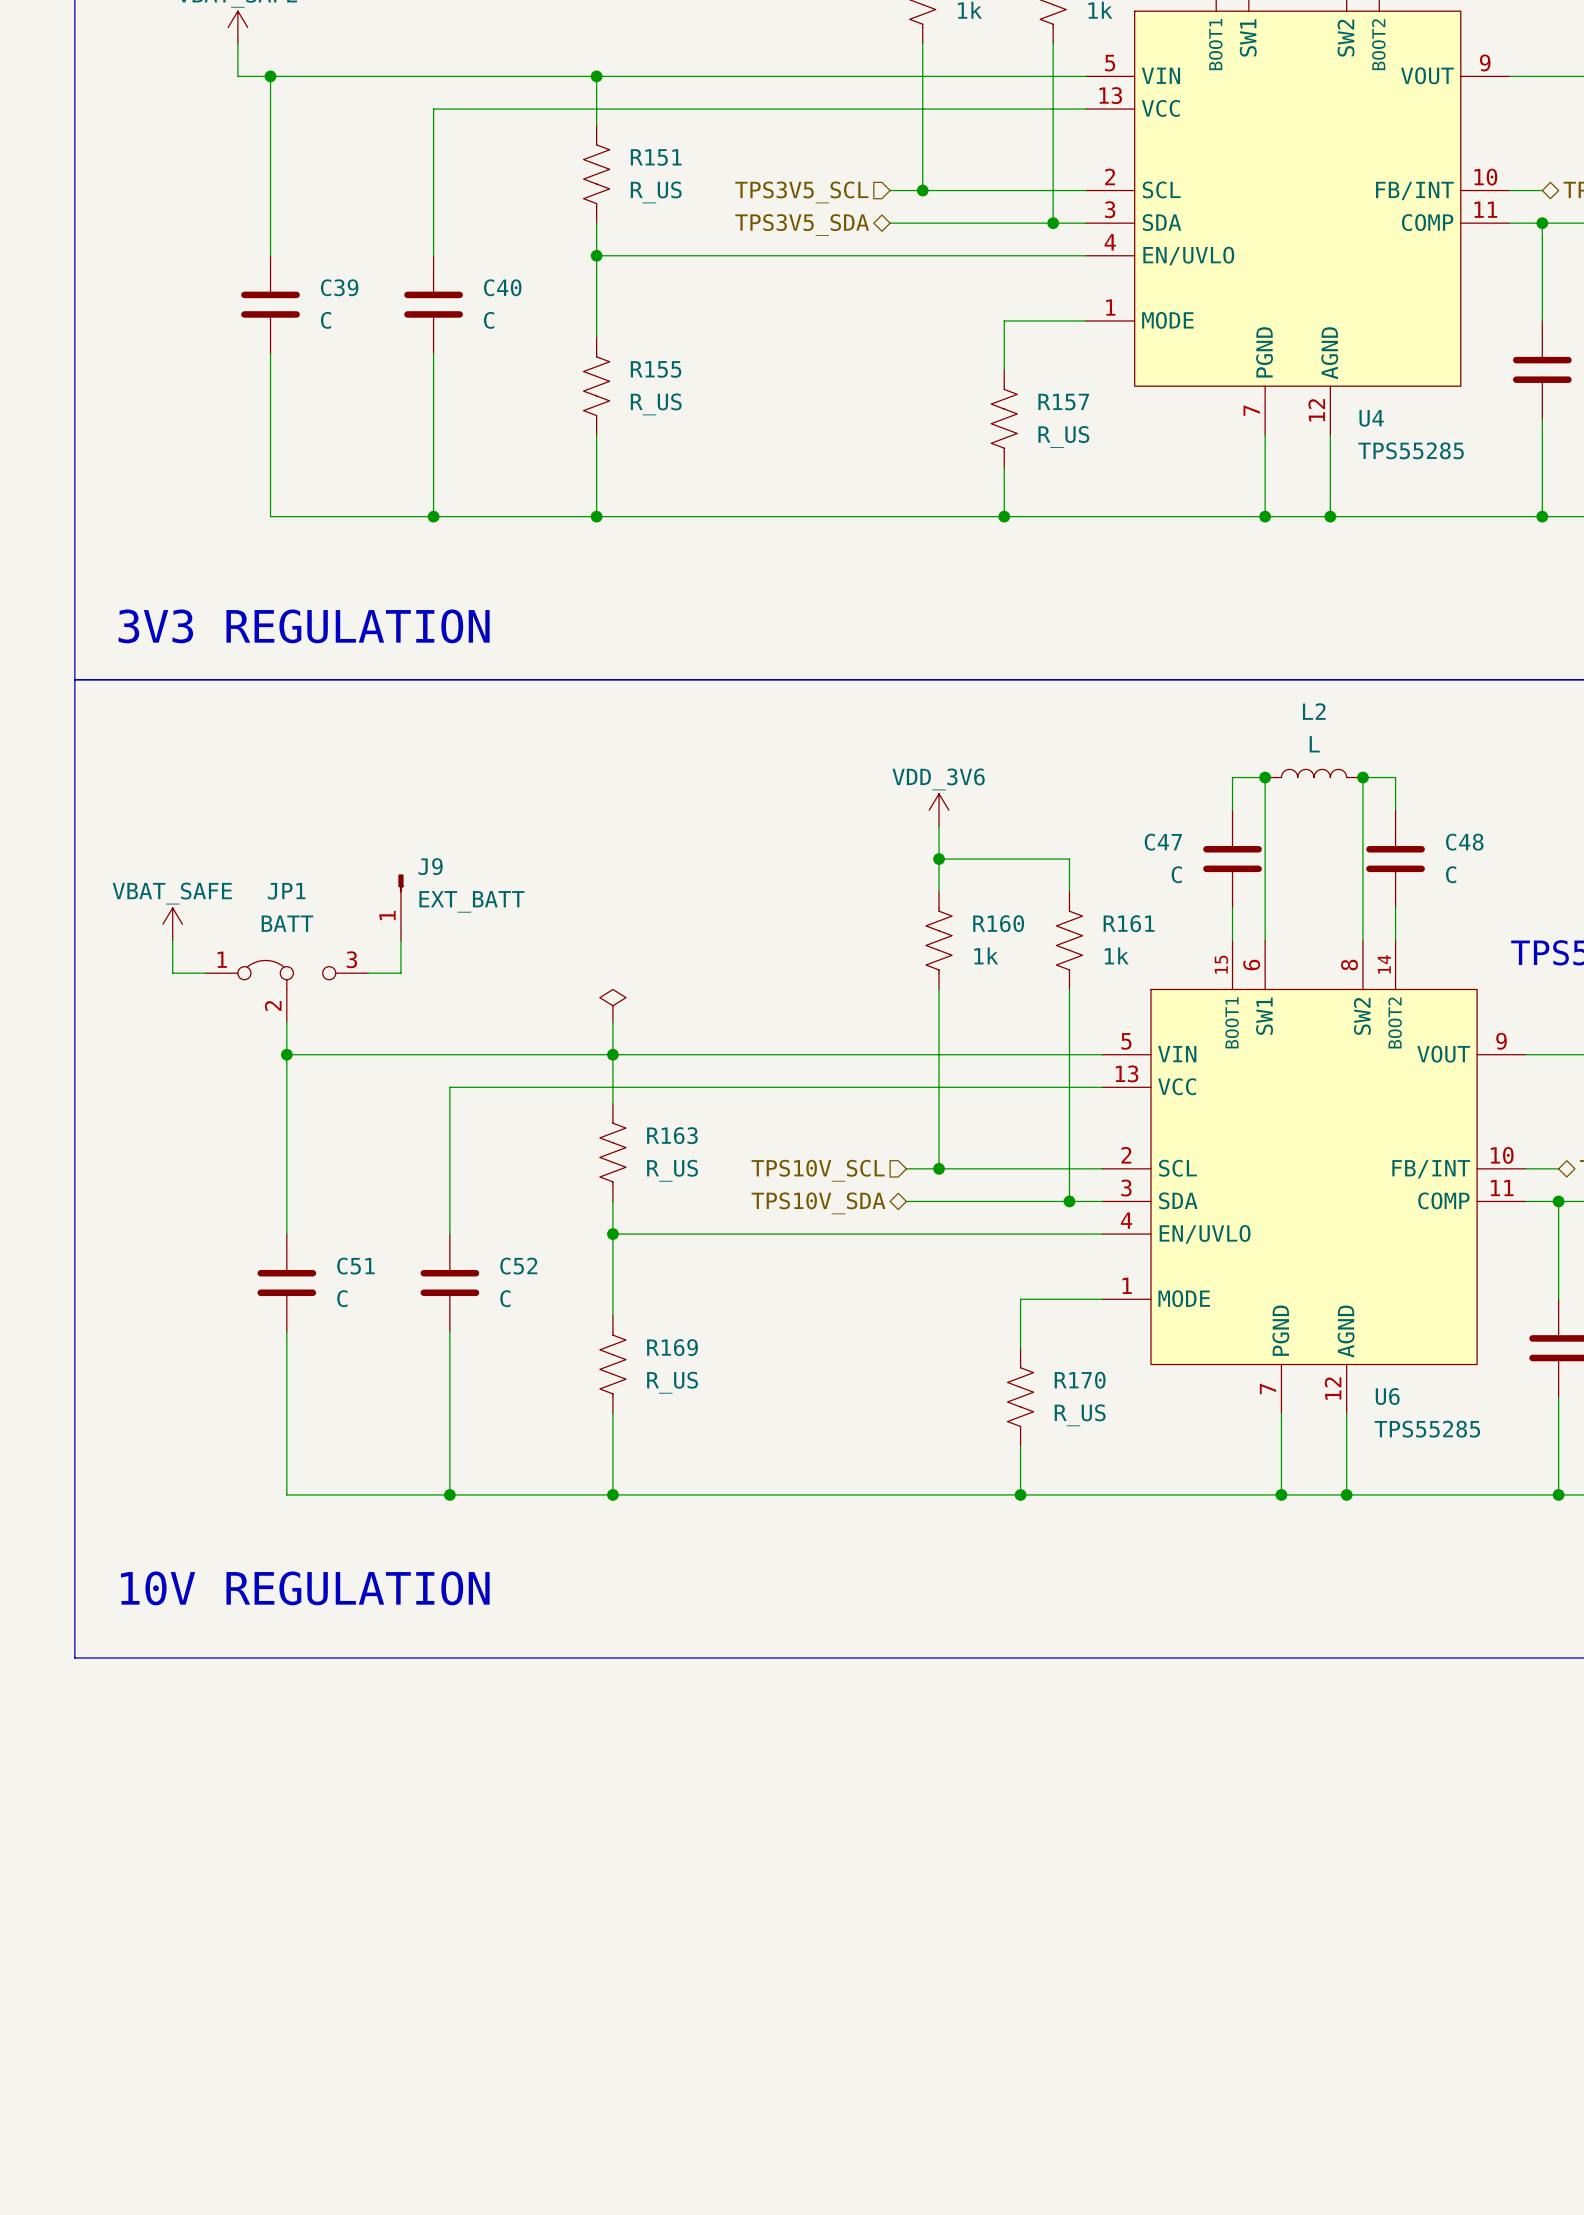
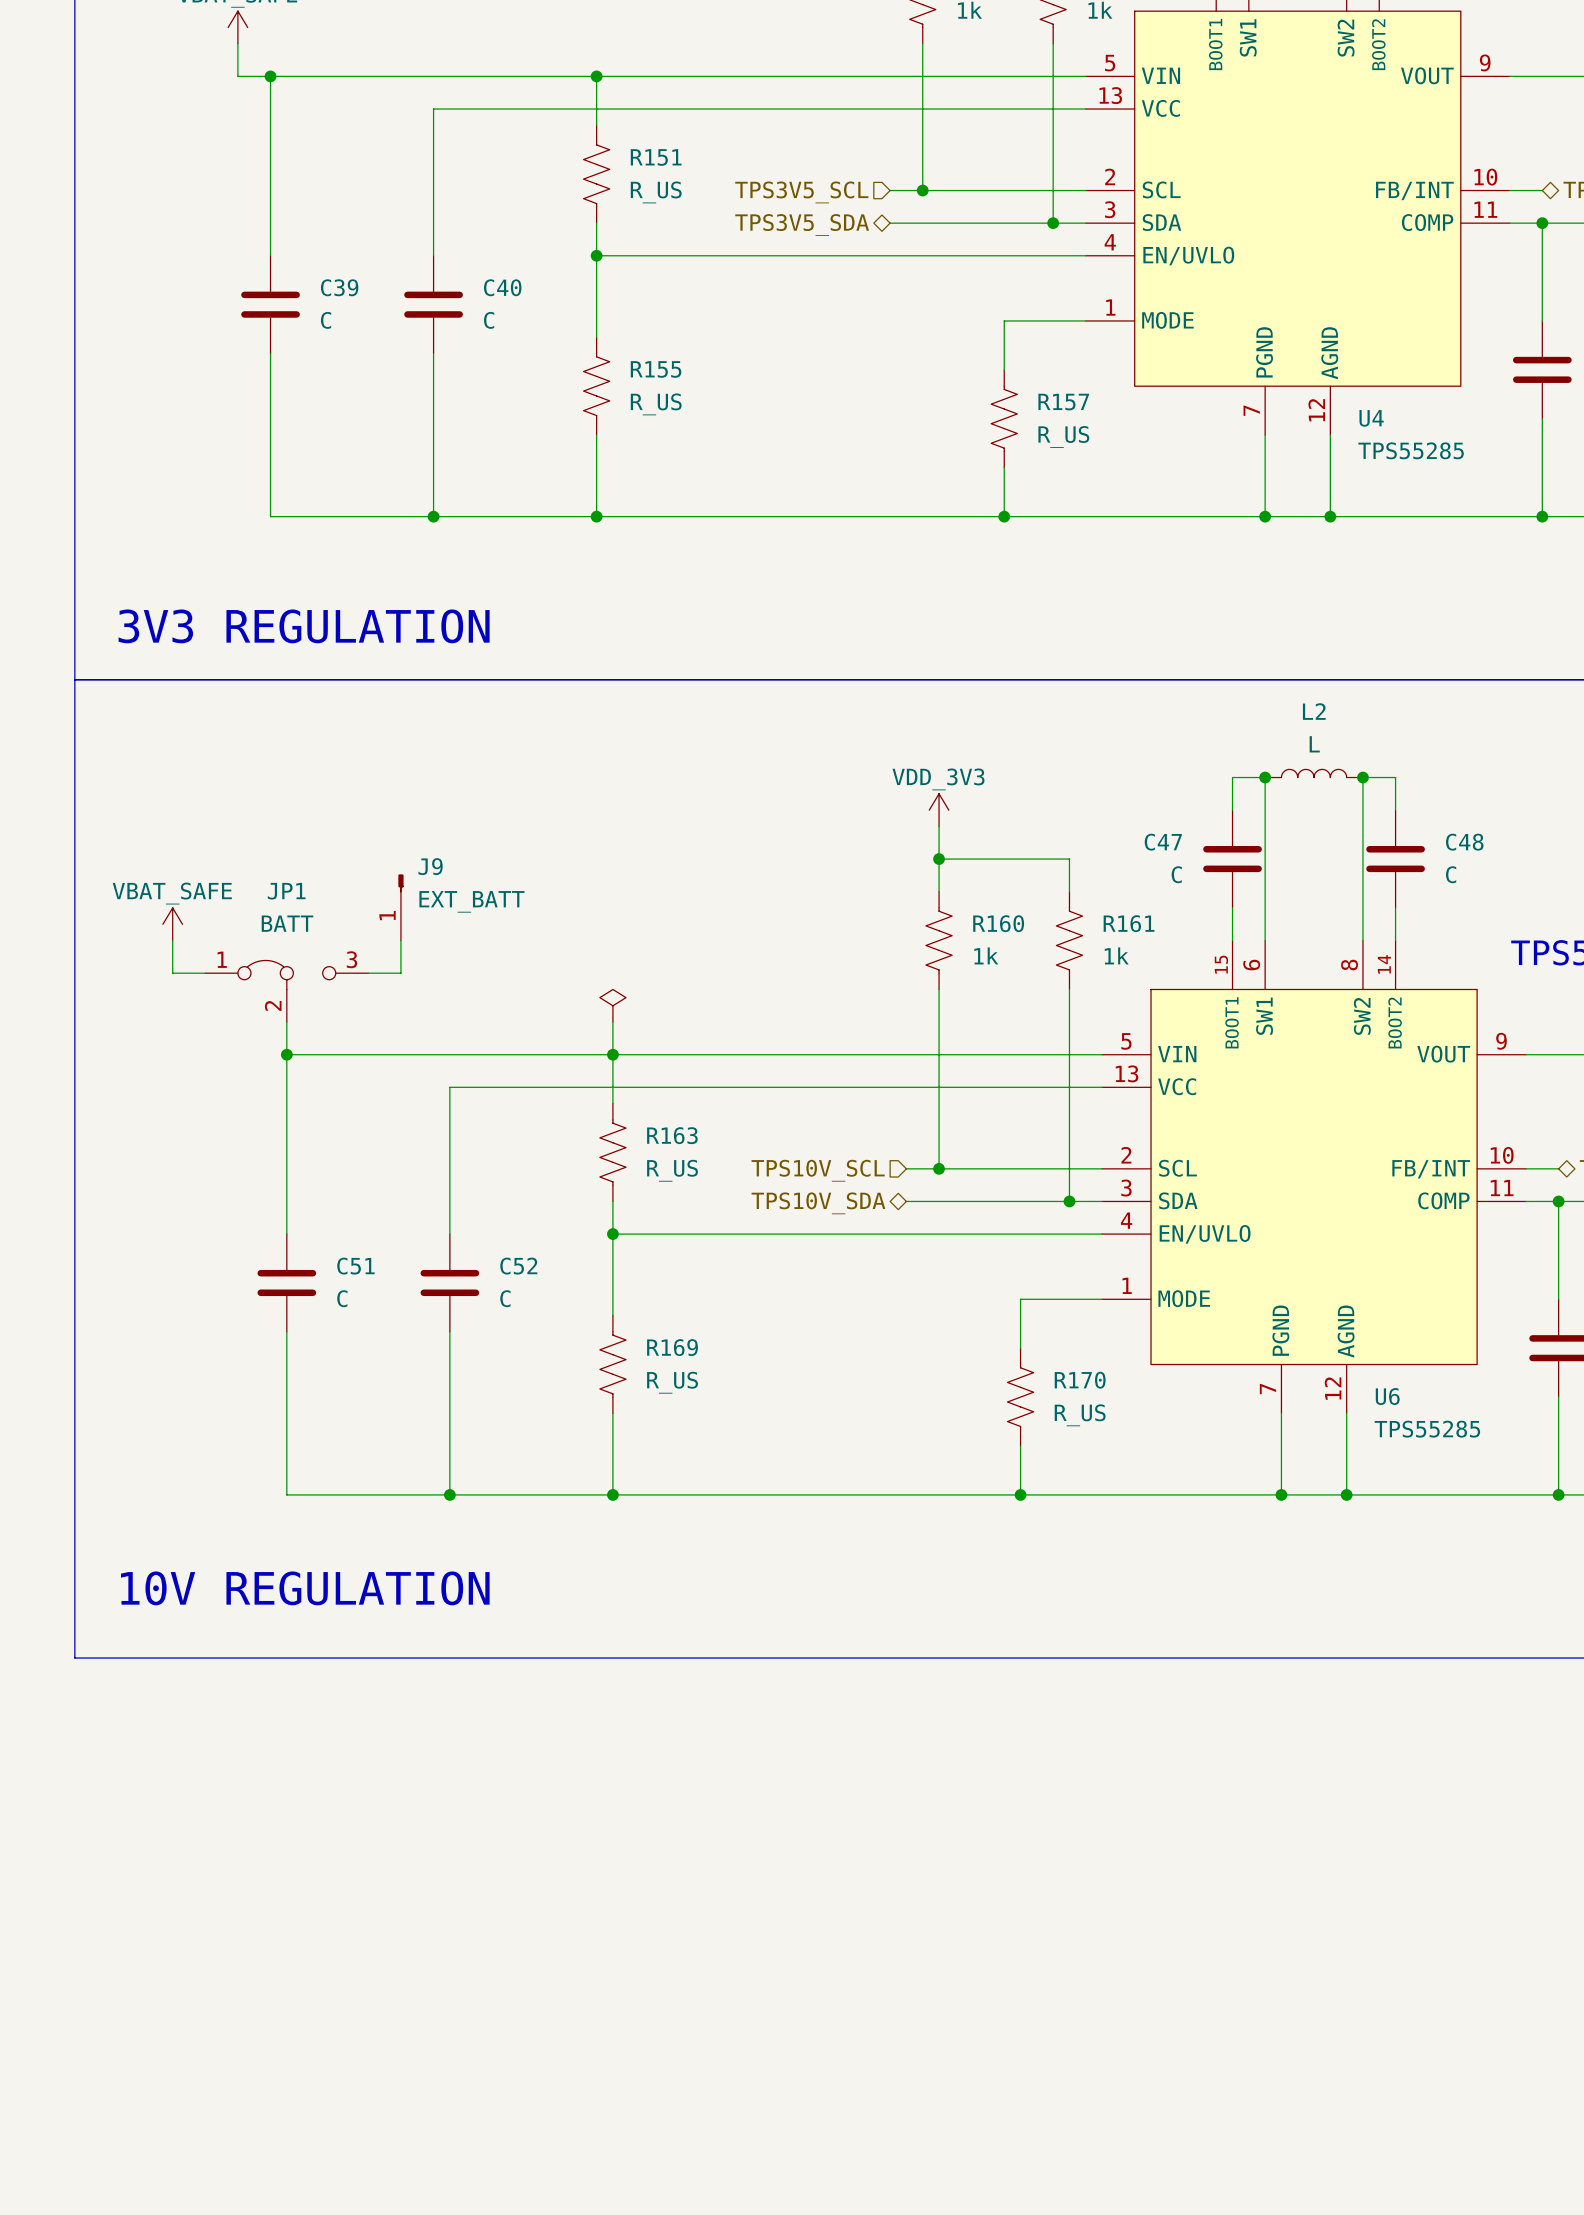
power symbol: VDD_3V6 (939, 810) -> VDD_3V3 (939, 810)

